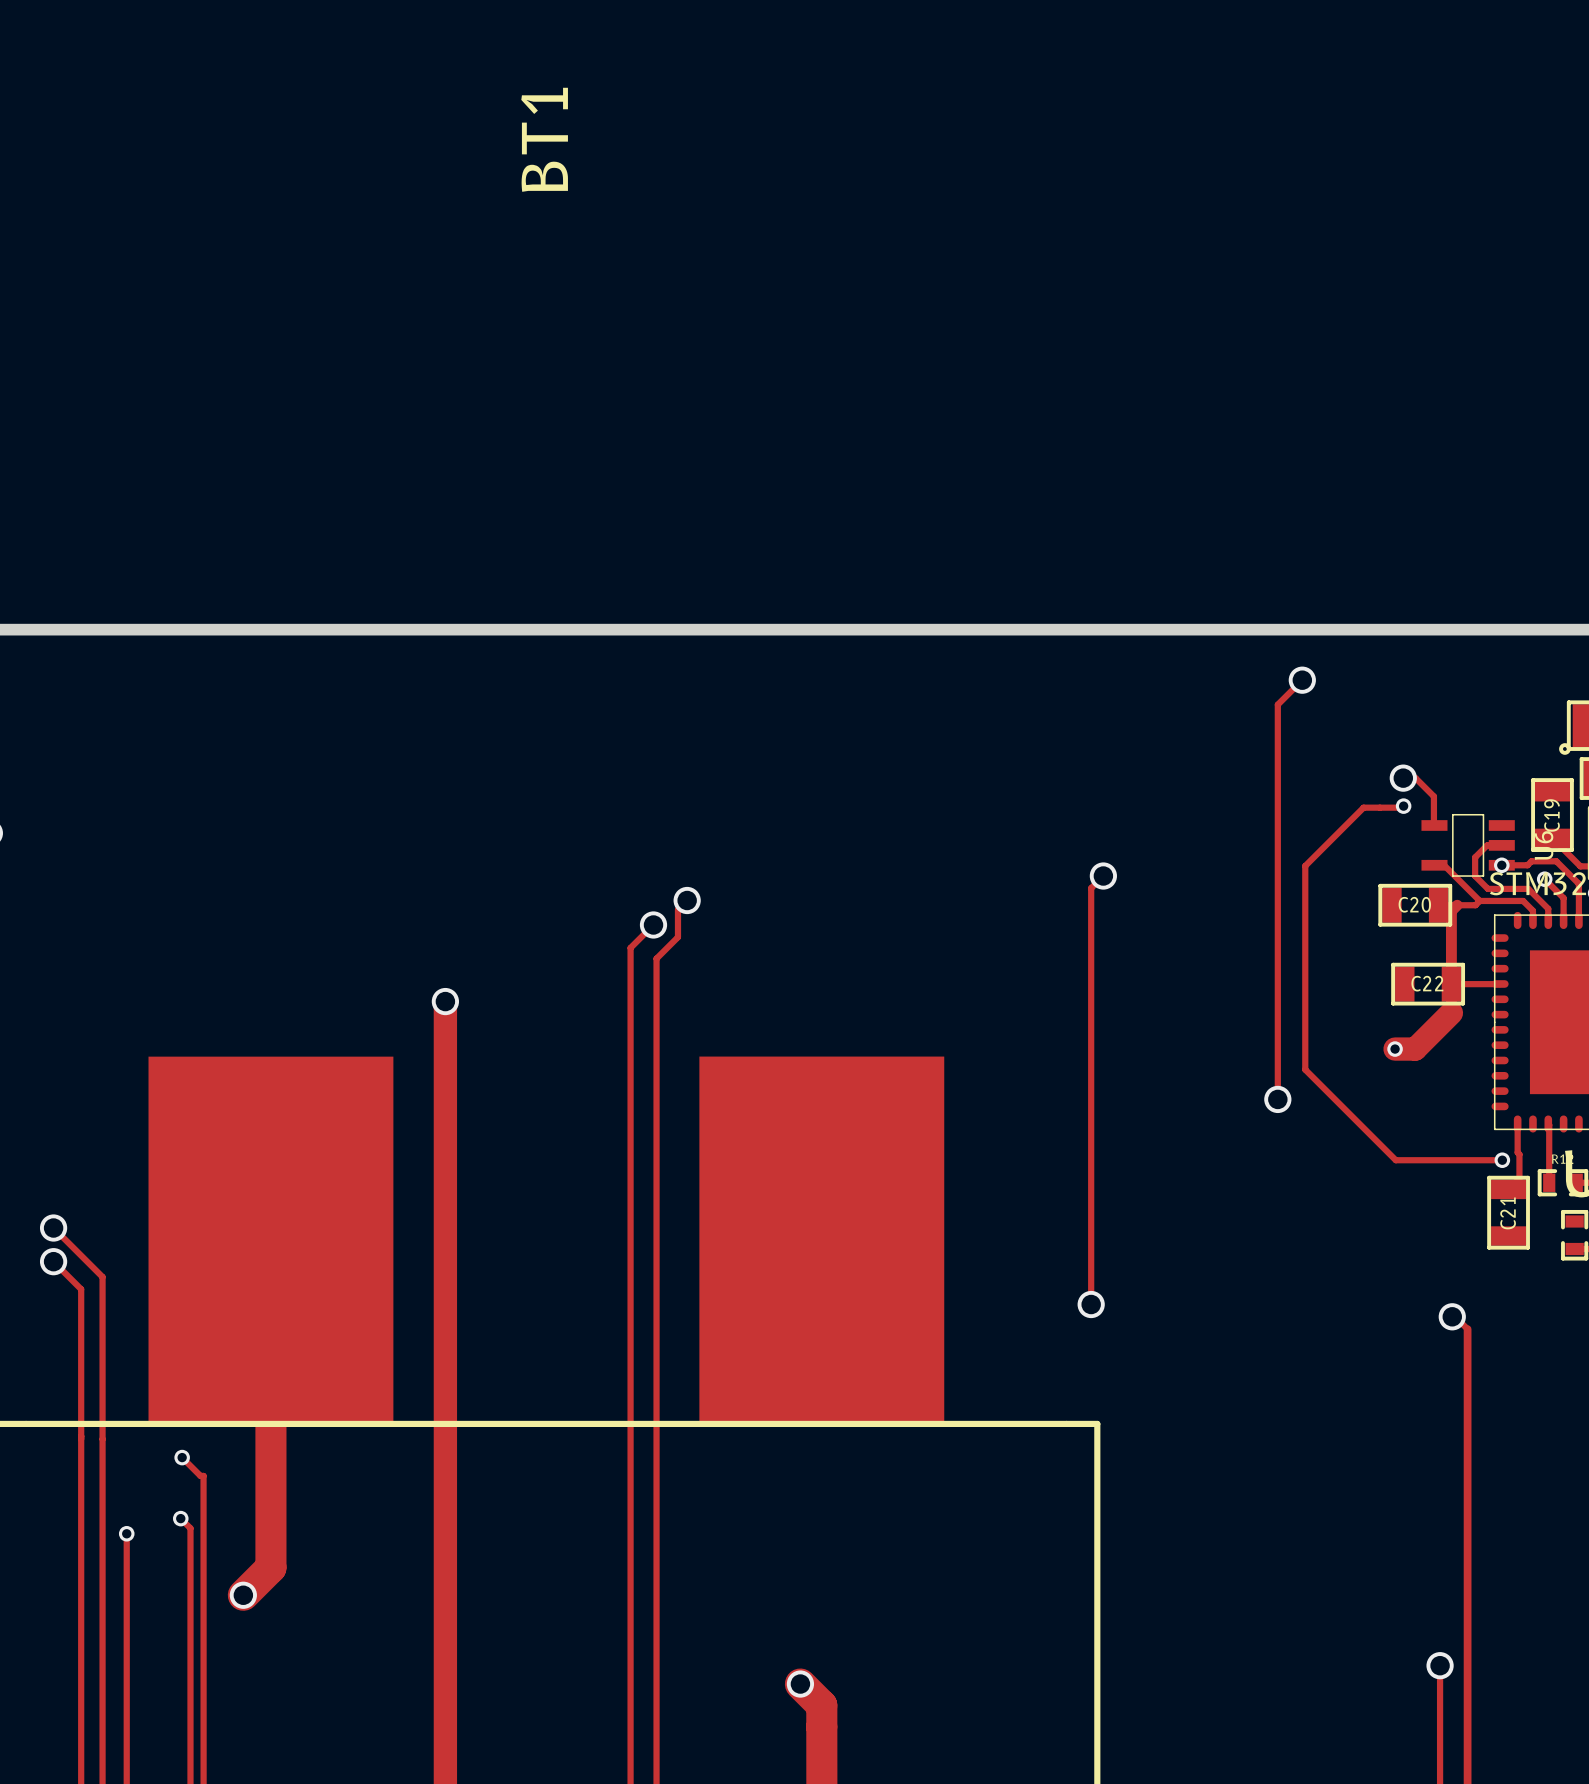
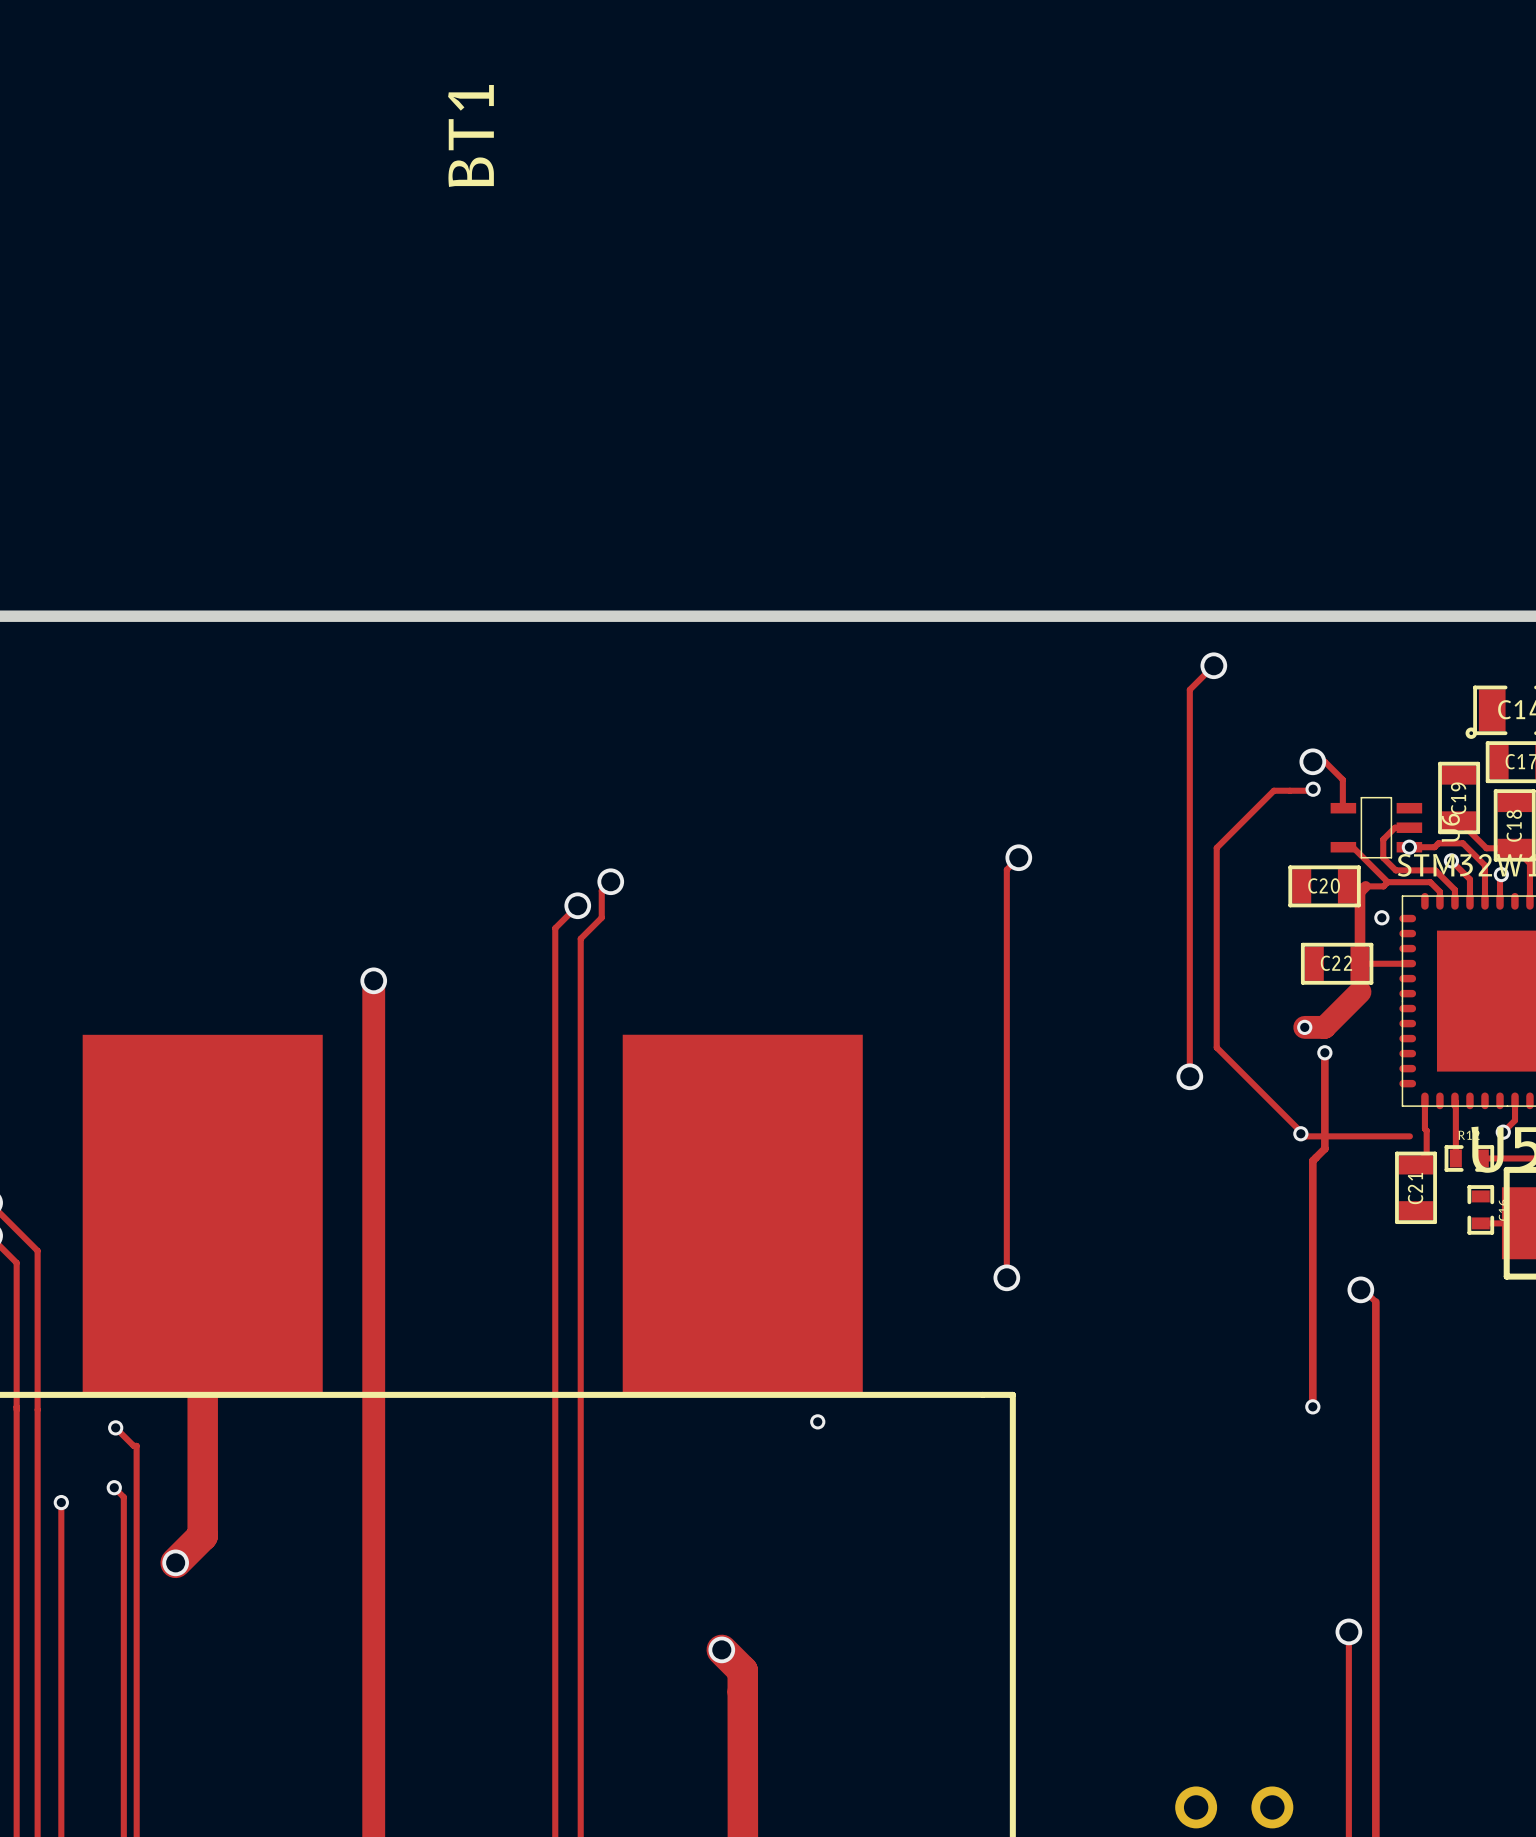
via: none -> (1381, 917)
track: none -> (1324, 1052) (1324, 1148) (1312, 1160) (1312, 1406)
via: none -> (1324, 1052)
via: none -> (1300, 1133)
via: (1502, 1160) -> none
via: none -> (1312, 1406)
via: none -> (817, 1421)

